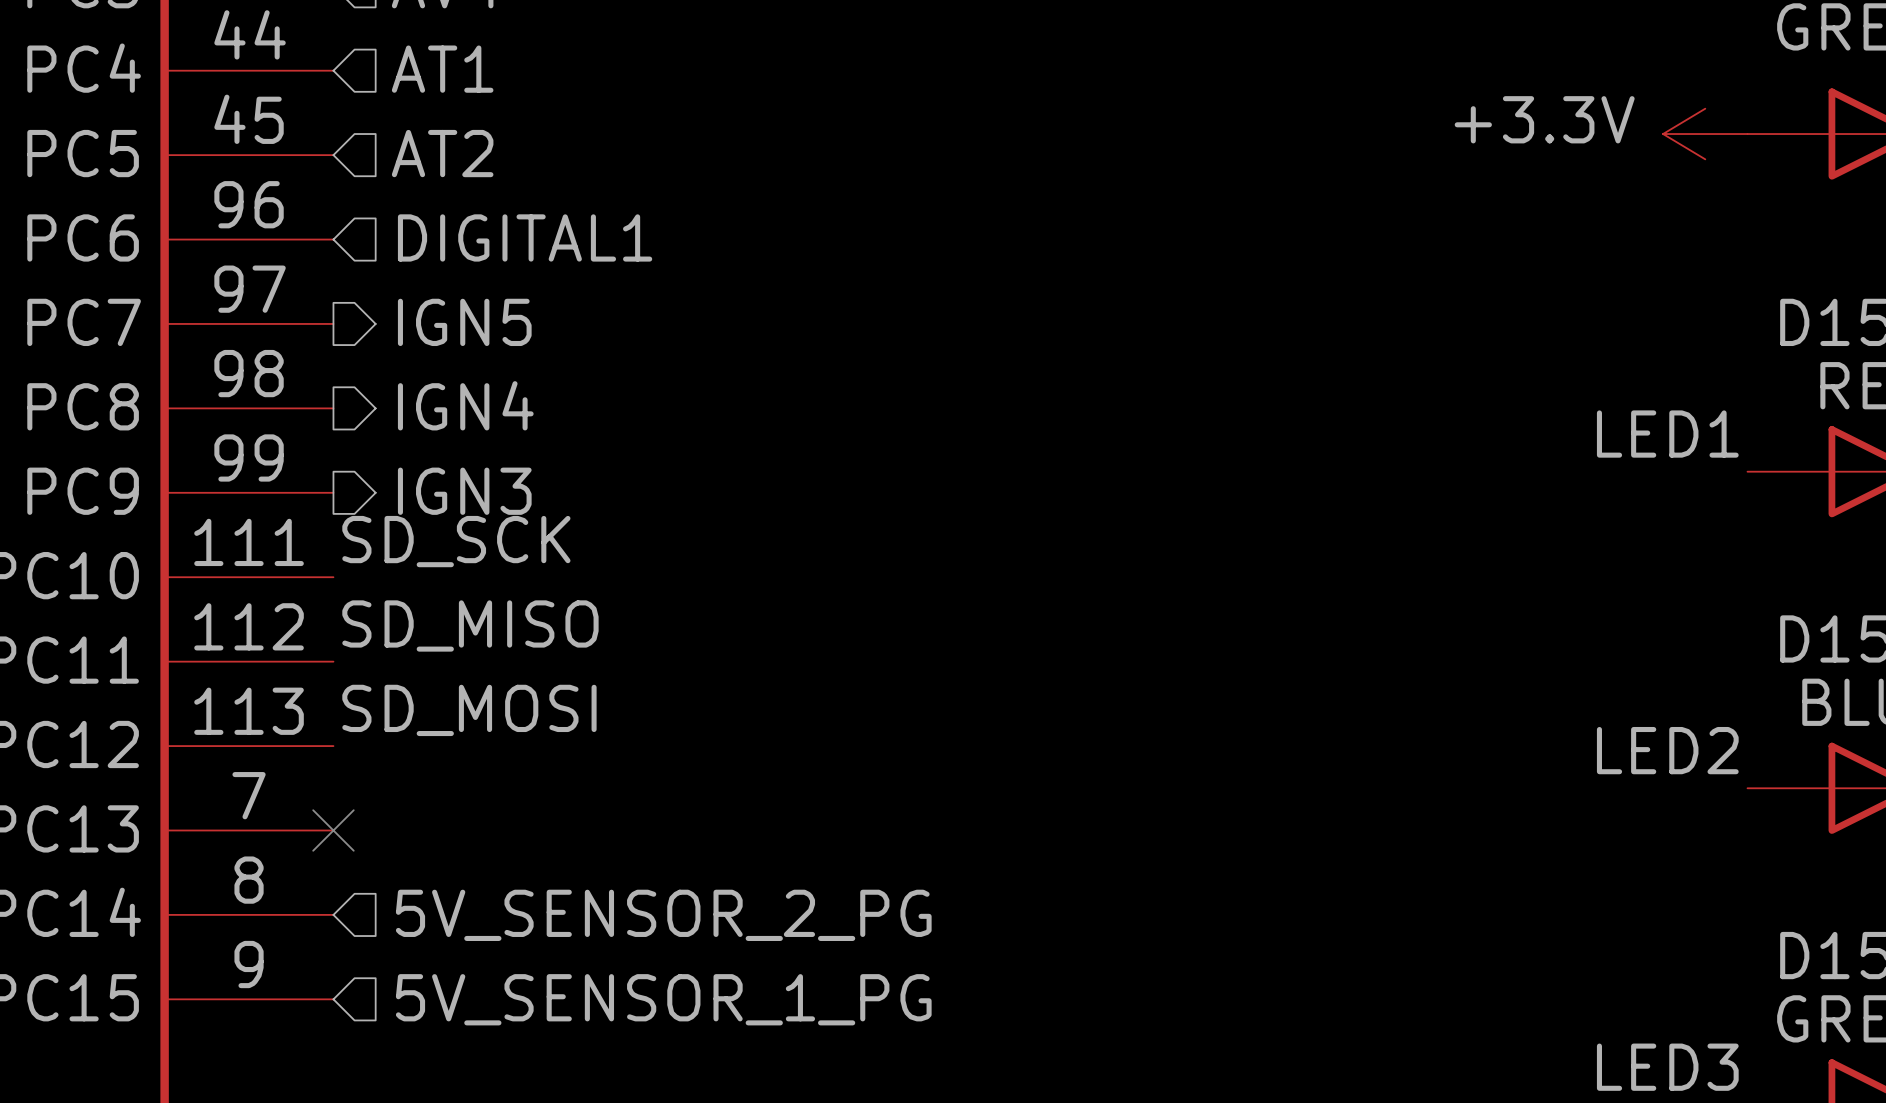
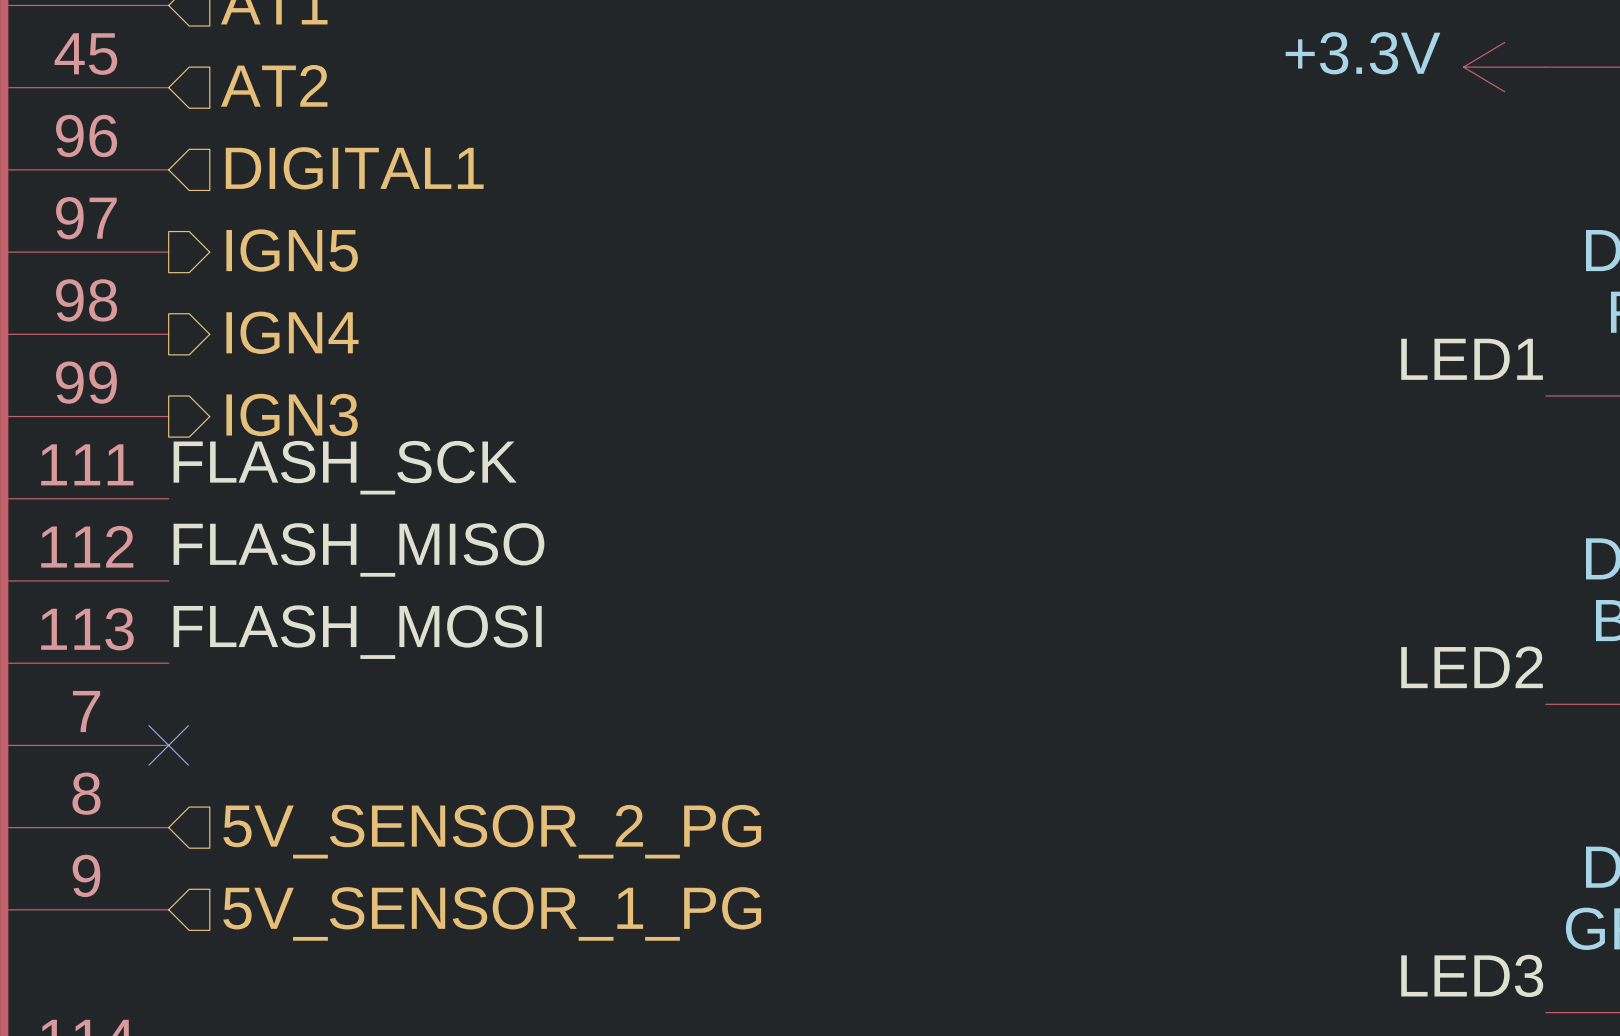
label: SD_SCK (456, 541) -> FLASH_SCK (345, 467)
label: SD_MISO (470, 625) -> FLASH_MISO (358, 549)
label: SD_MOSI (469, 710) -> FLASH_MOSI (357, 632)

